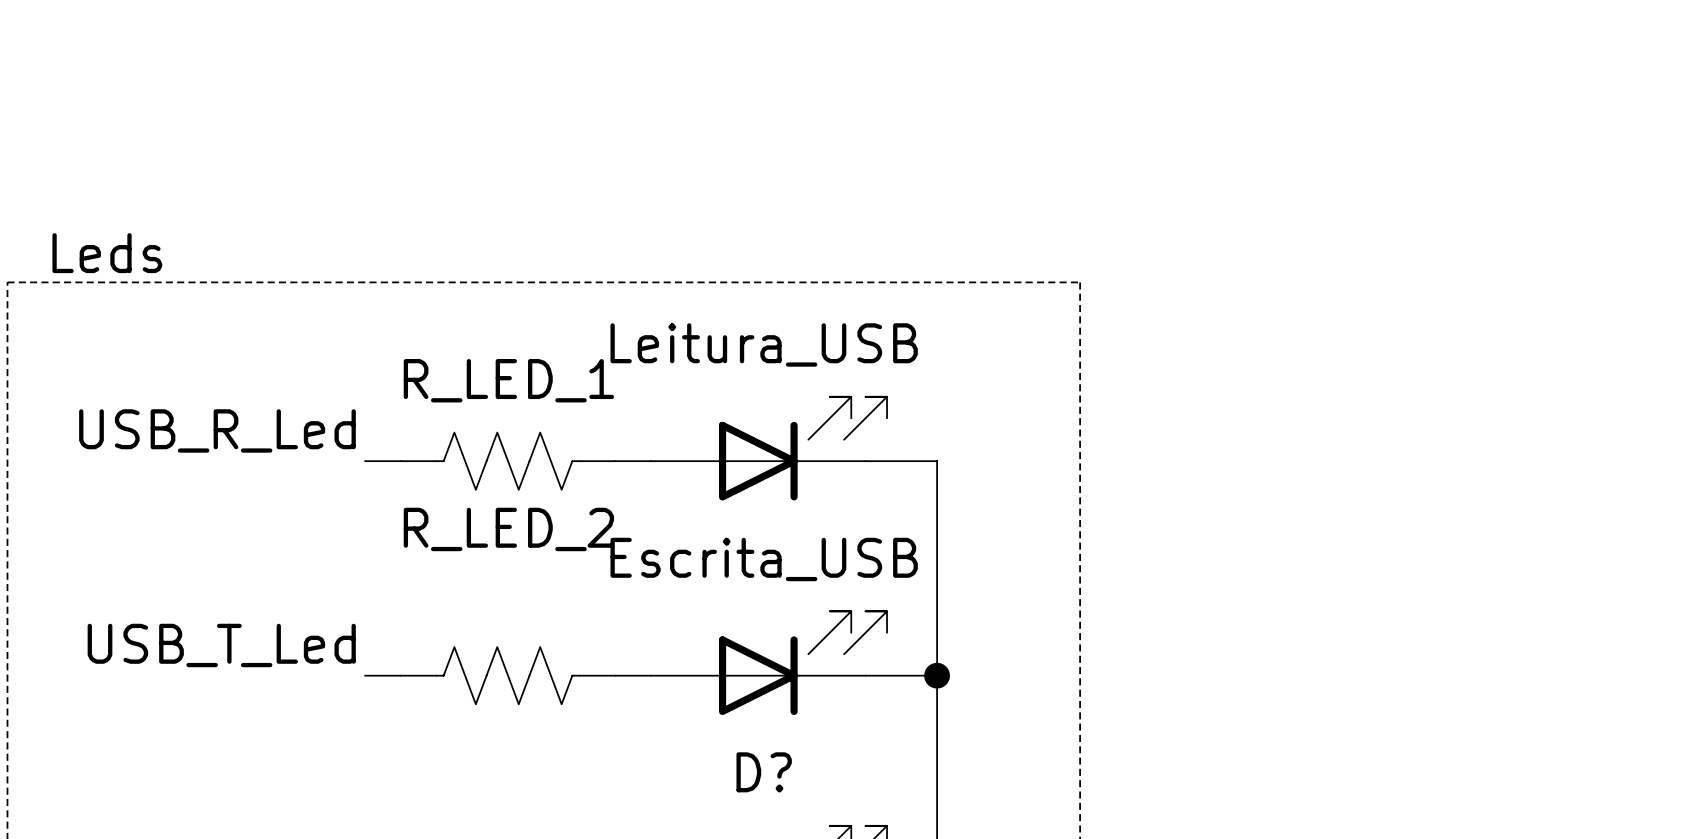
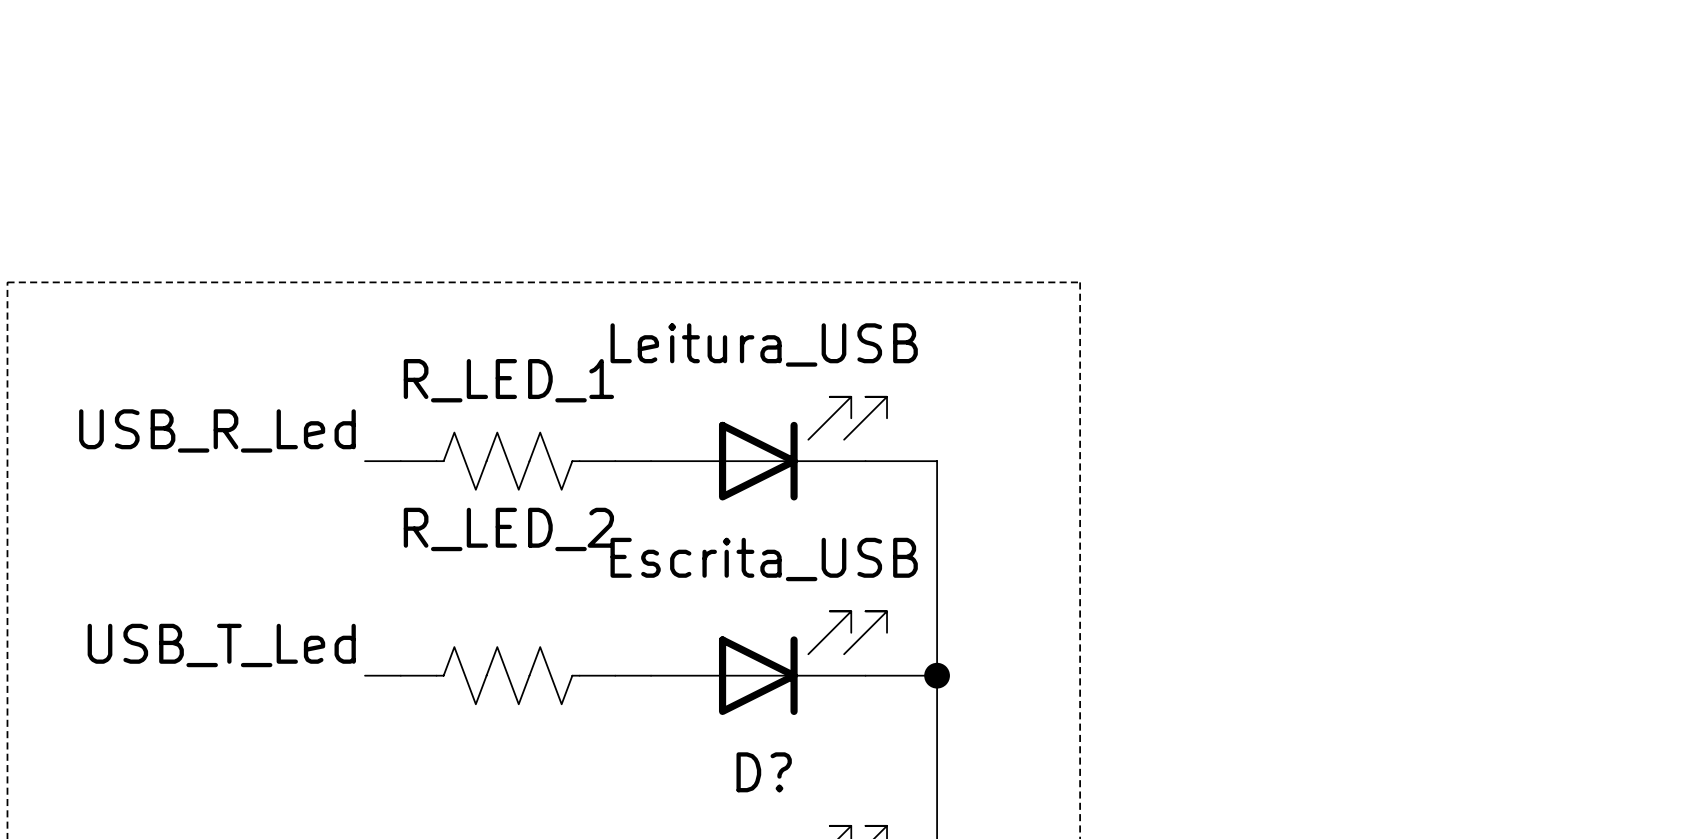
text: Leds (107, 253) -> none

